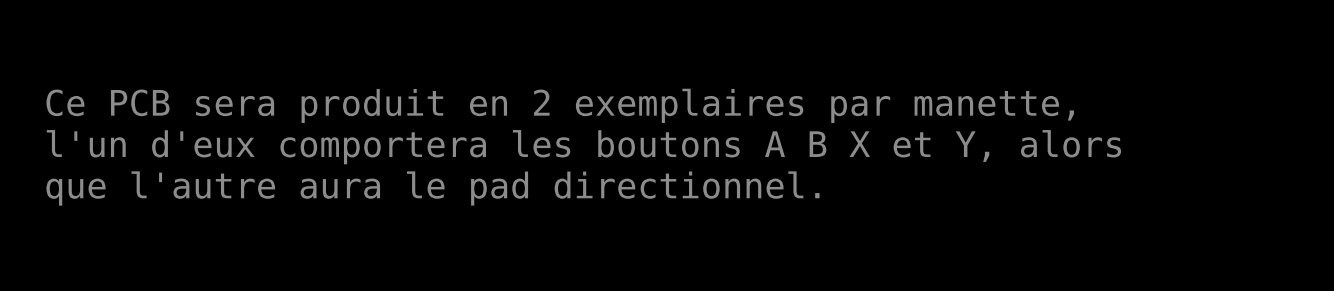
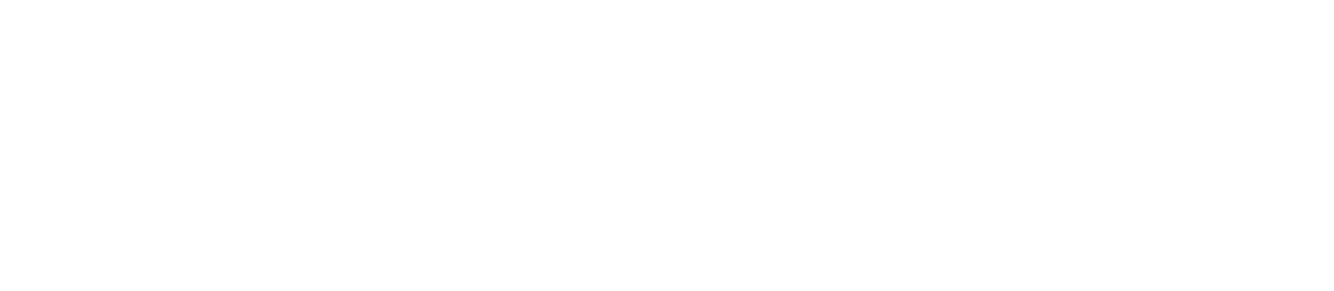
text: Ce PCB sera produit en 2 exemplaires par manette, (560, 105) -> none
text: l'un d'eux comportera les boutons A B X et Y, alors (583, 147) -> none
text: que l'autre aura le pad directionnel. (432, 188) -> none

